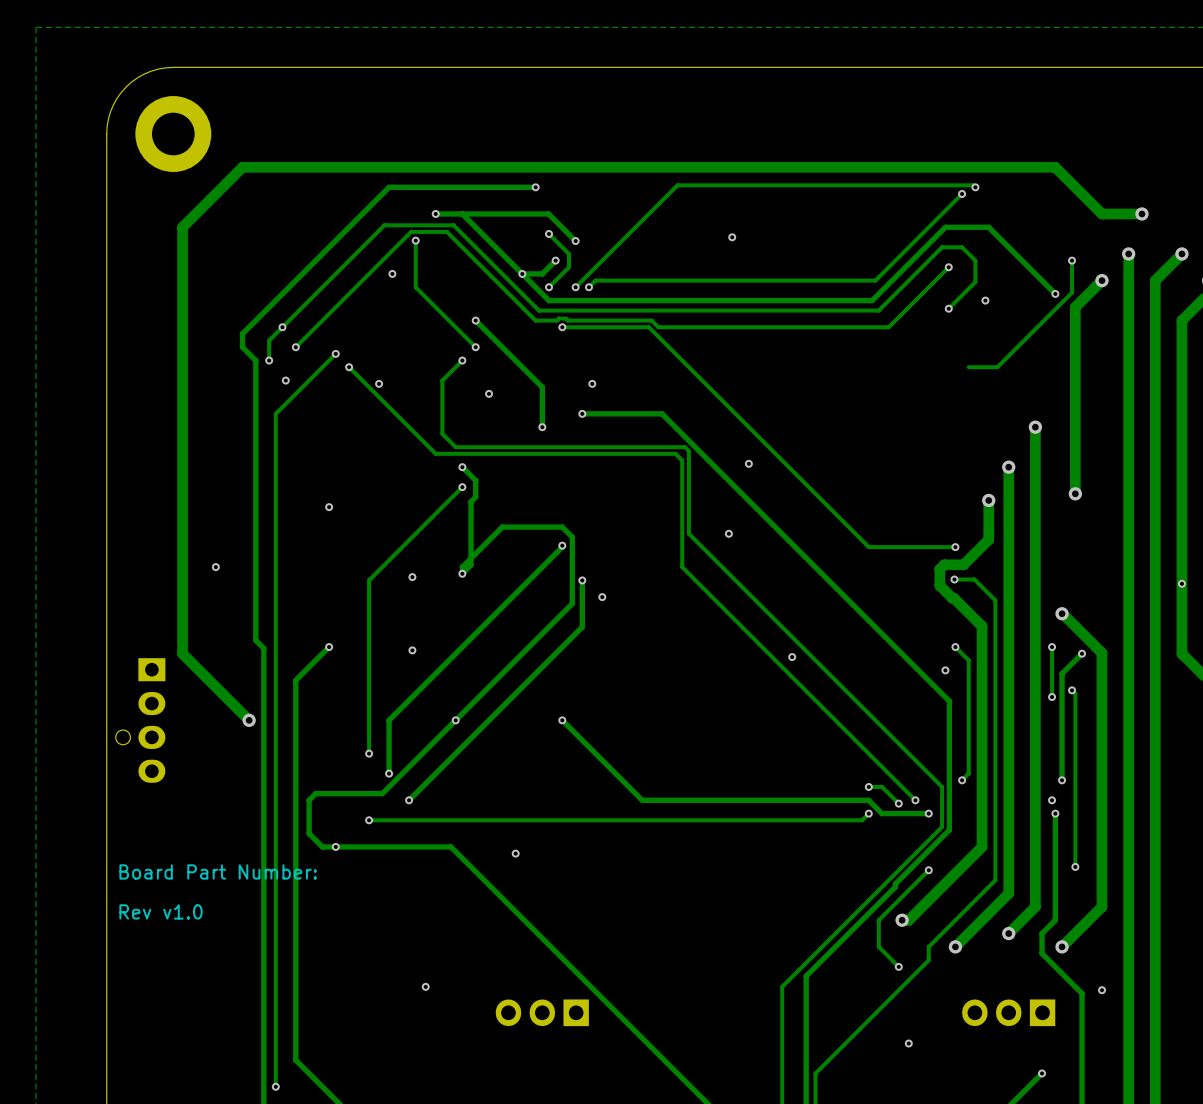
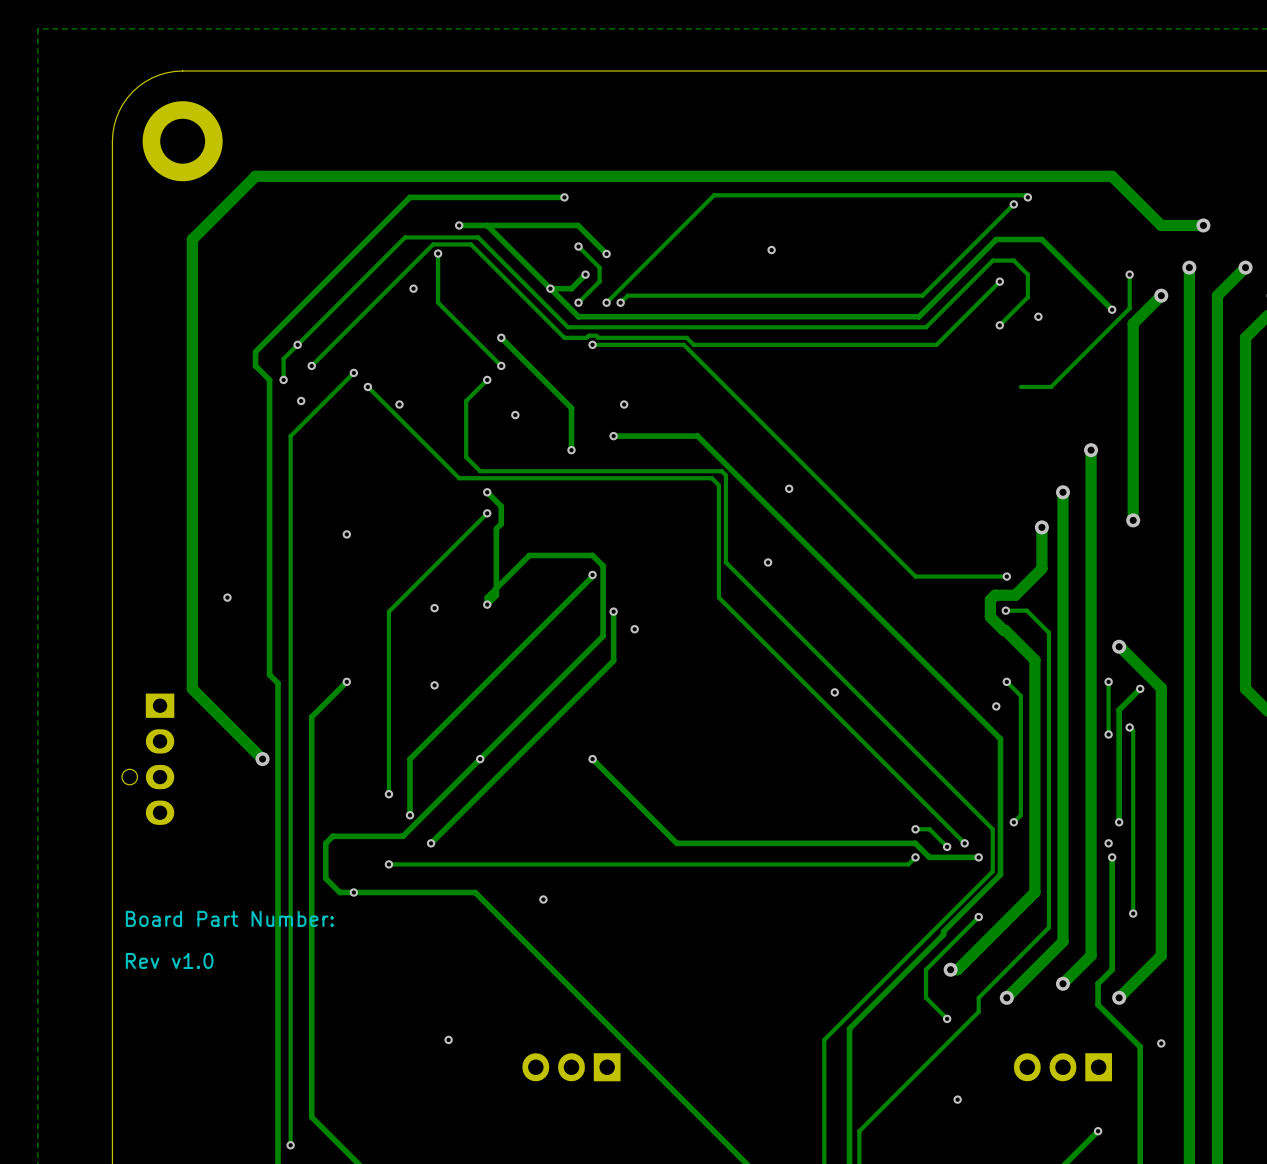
via: (1181, 583) -> none

